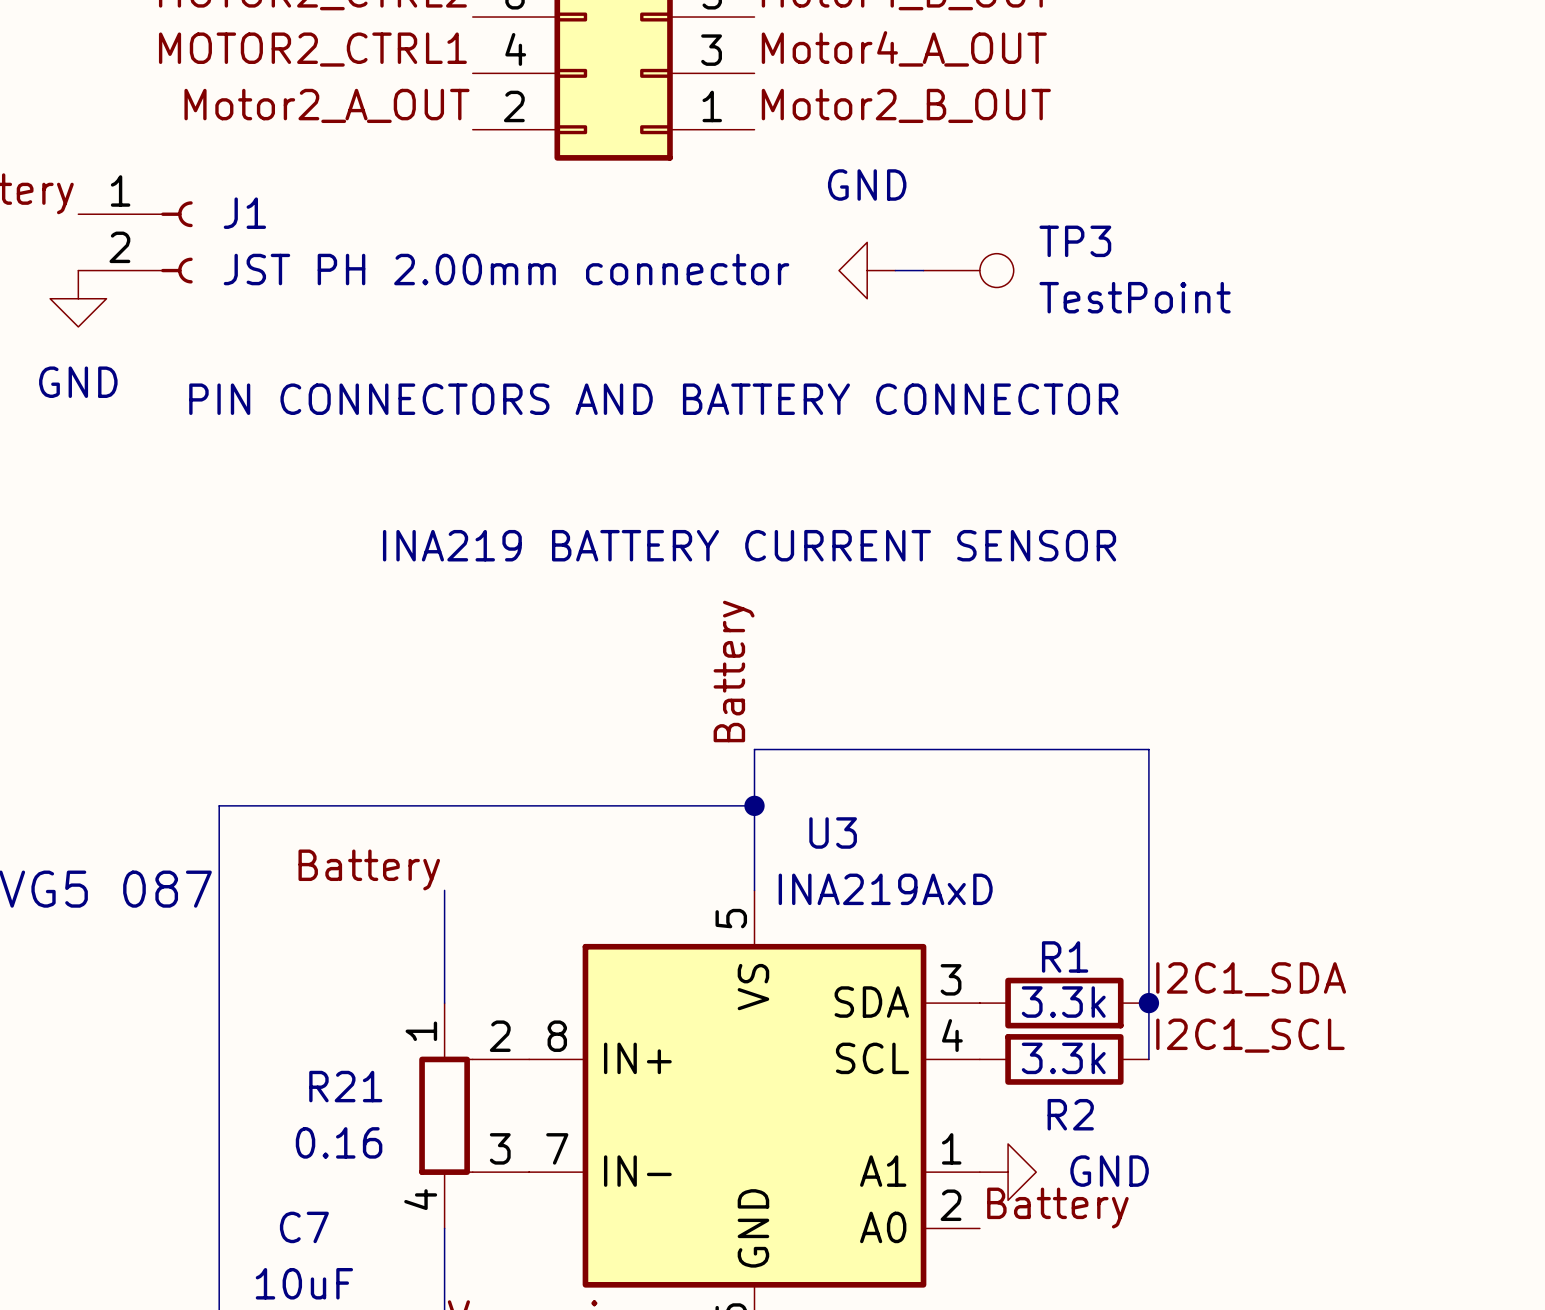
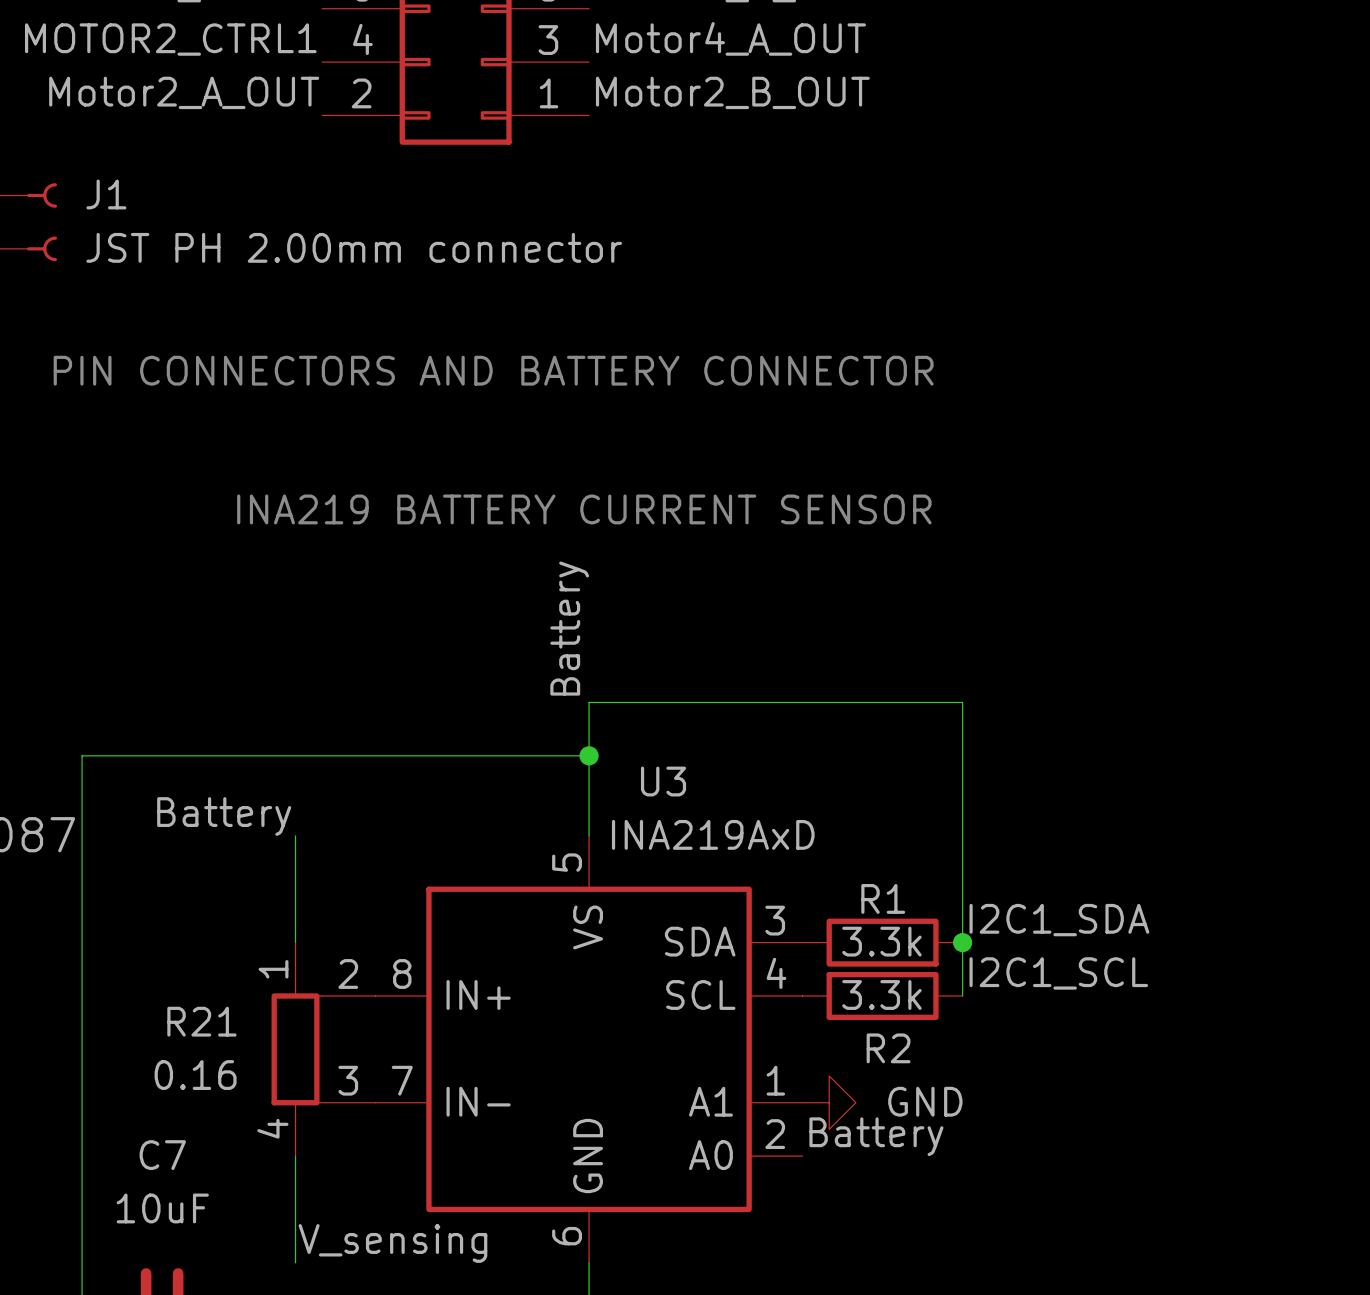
power symbol: GND (867, 270) -> none
wire: (895, 270) (923, 270) -> none
TP3: TestPoint (968, 270) -> none

